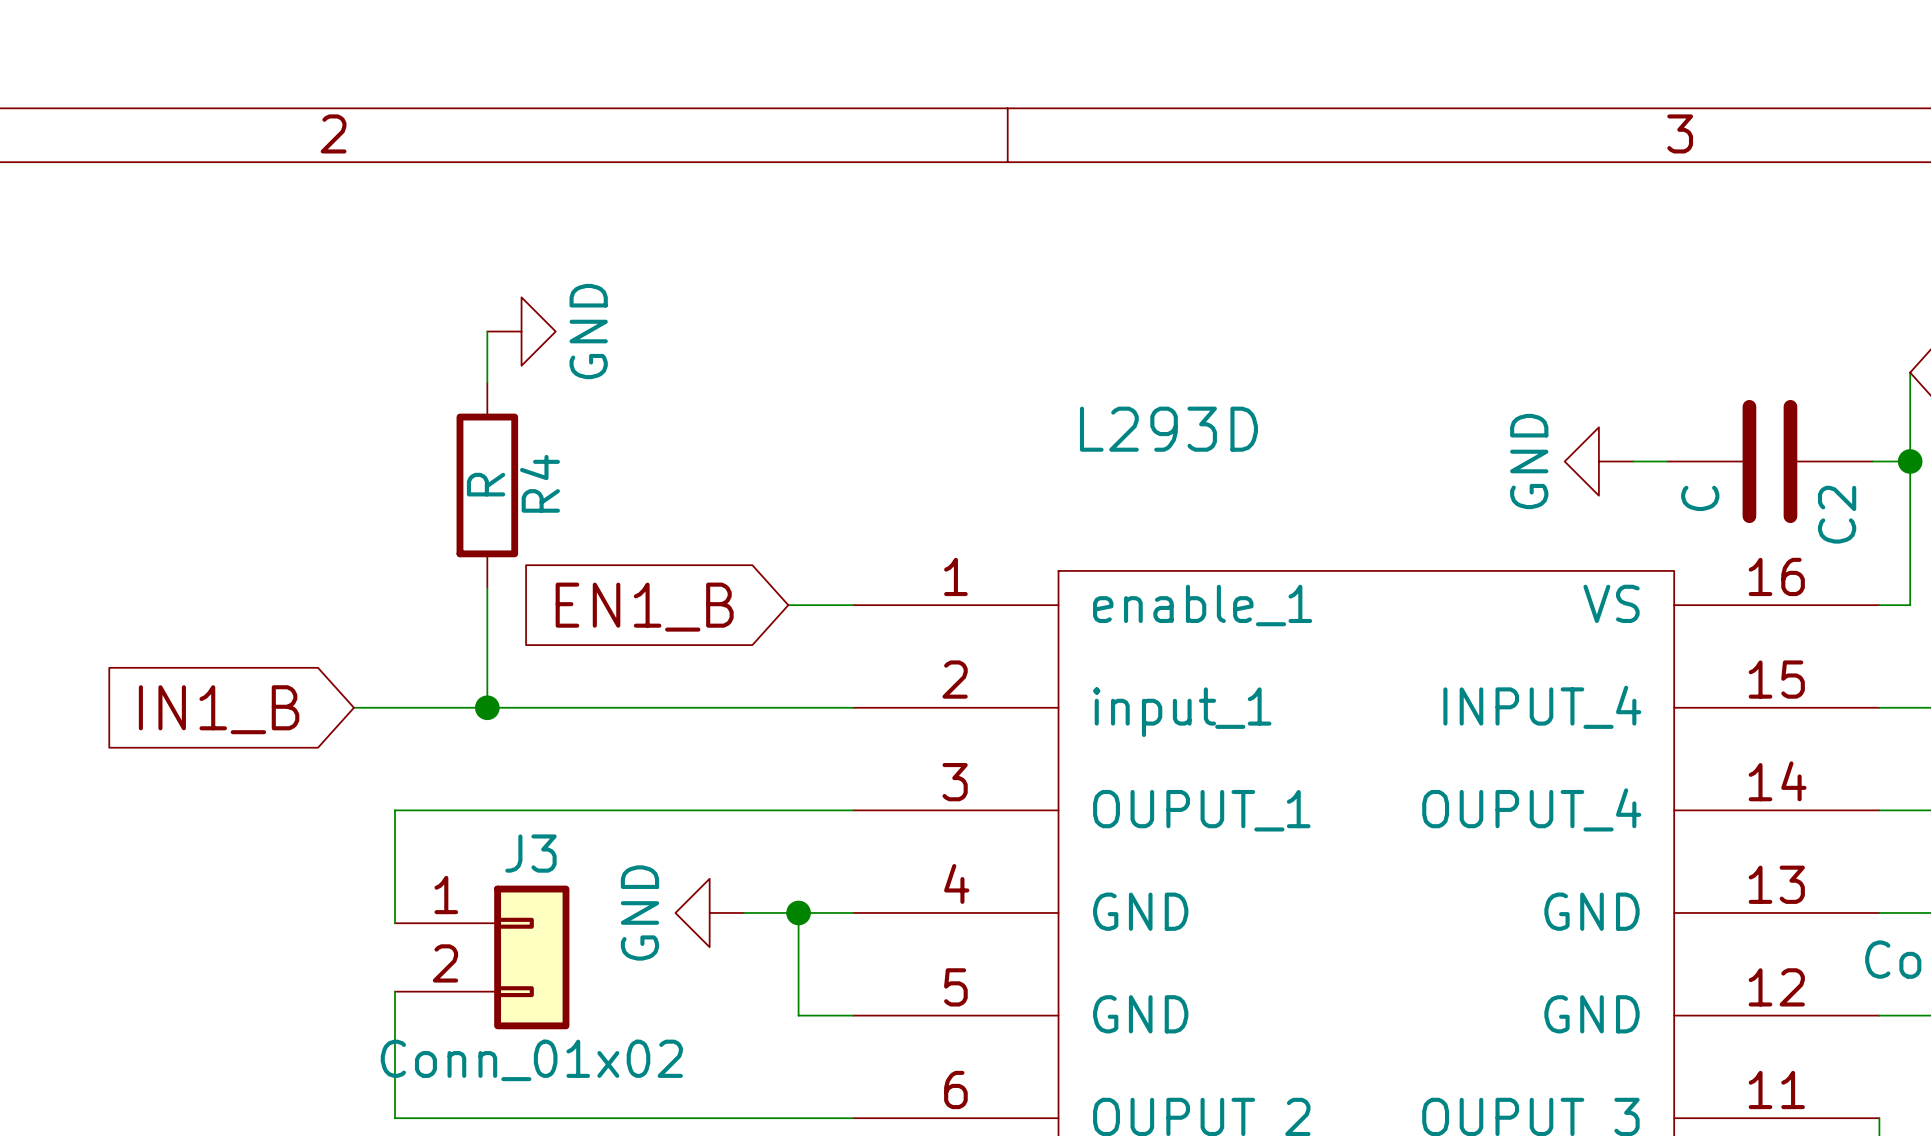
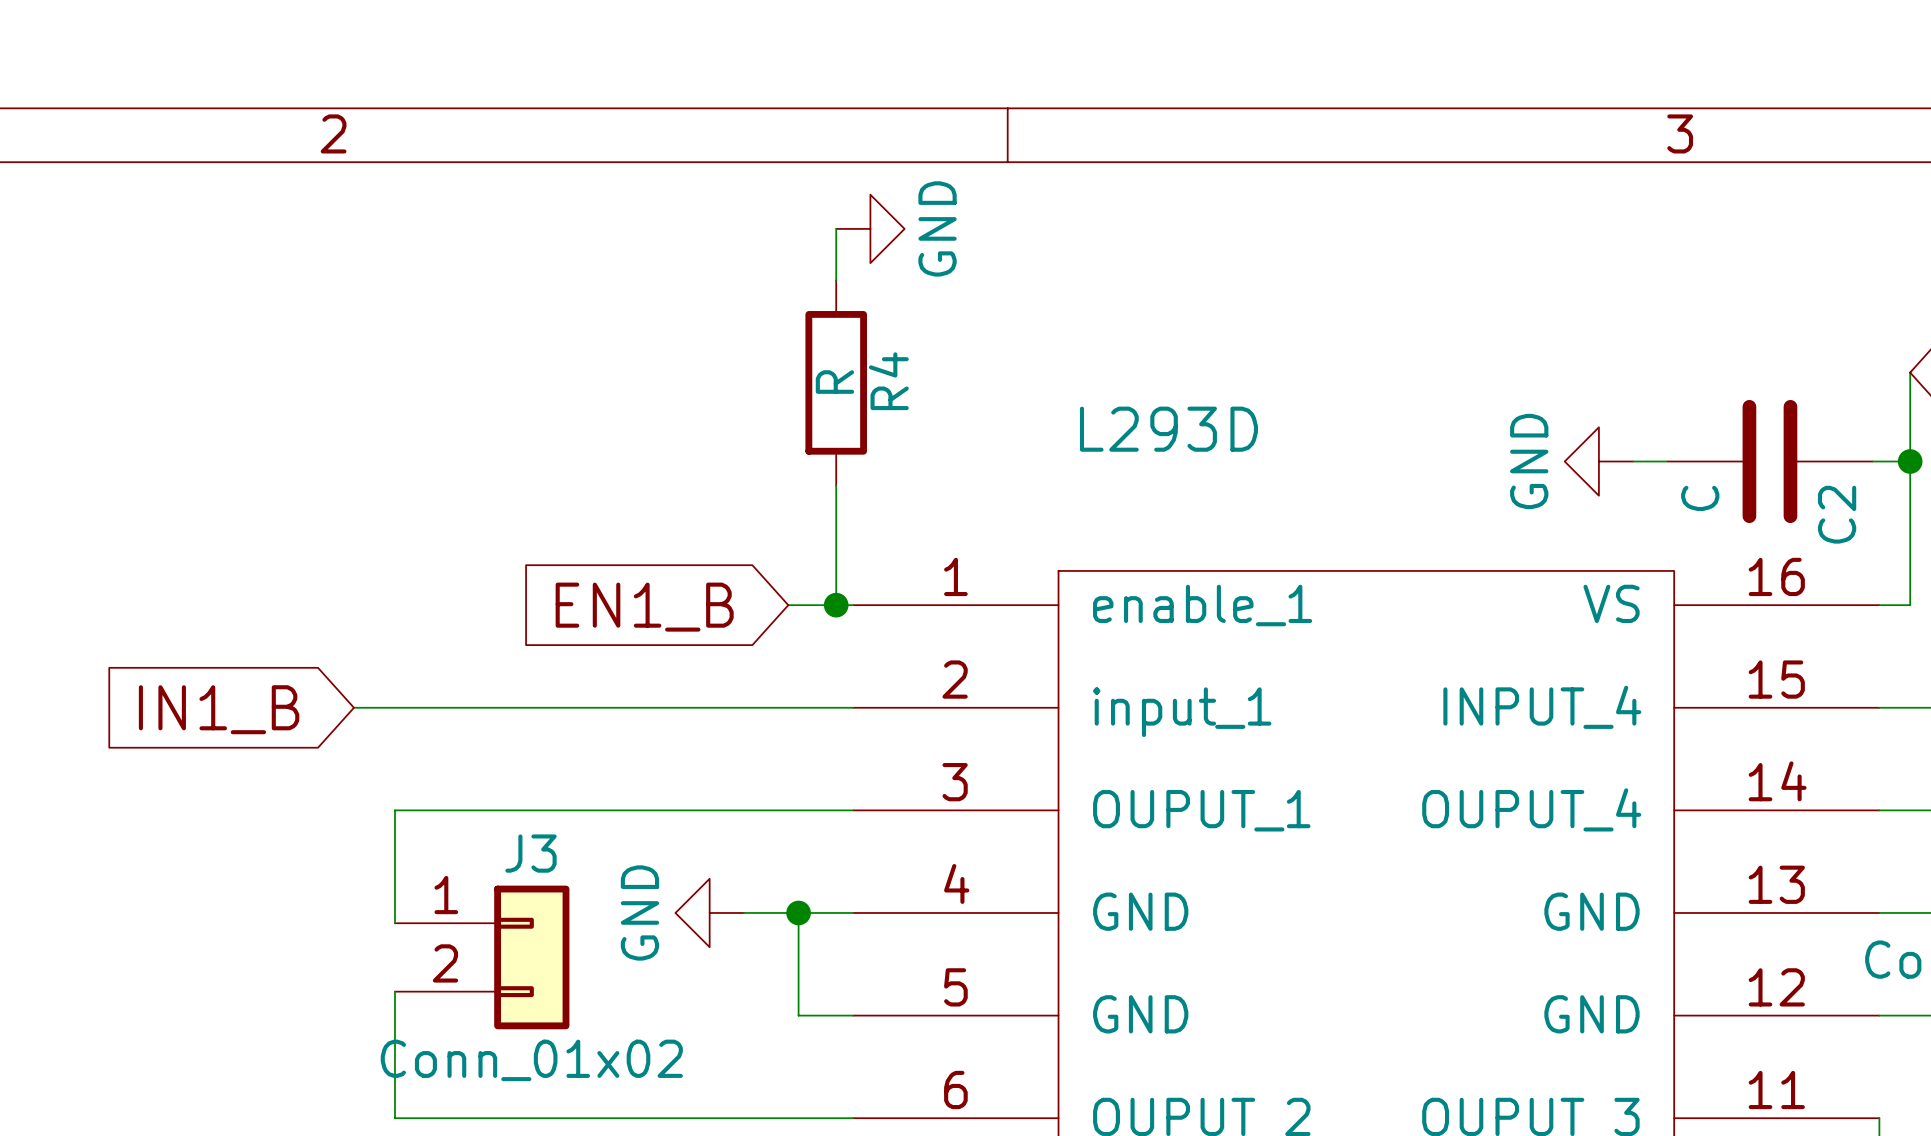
wire: (487, 331) (487, 382) -> (836, 228) (836, 280)
power symbol position: GND (521, 331) -> GND (870, 228)
R4 position: (487, 485) -> (836, 382)
wire: (487, 588) (487, 707) -> (836, 485) (836, 605)
junction: none -> (836, 605)
junction: (487, 707) -> none

